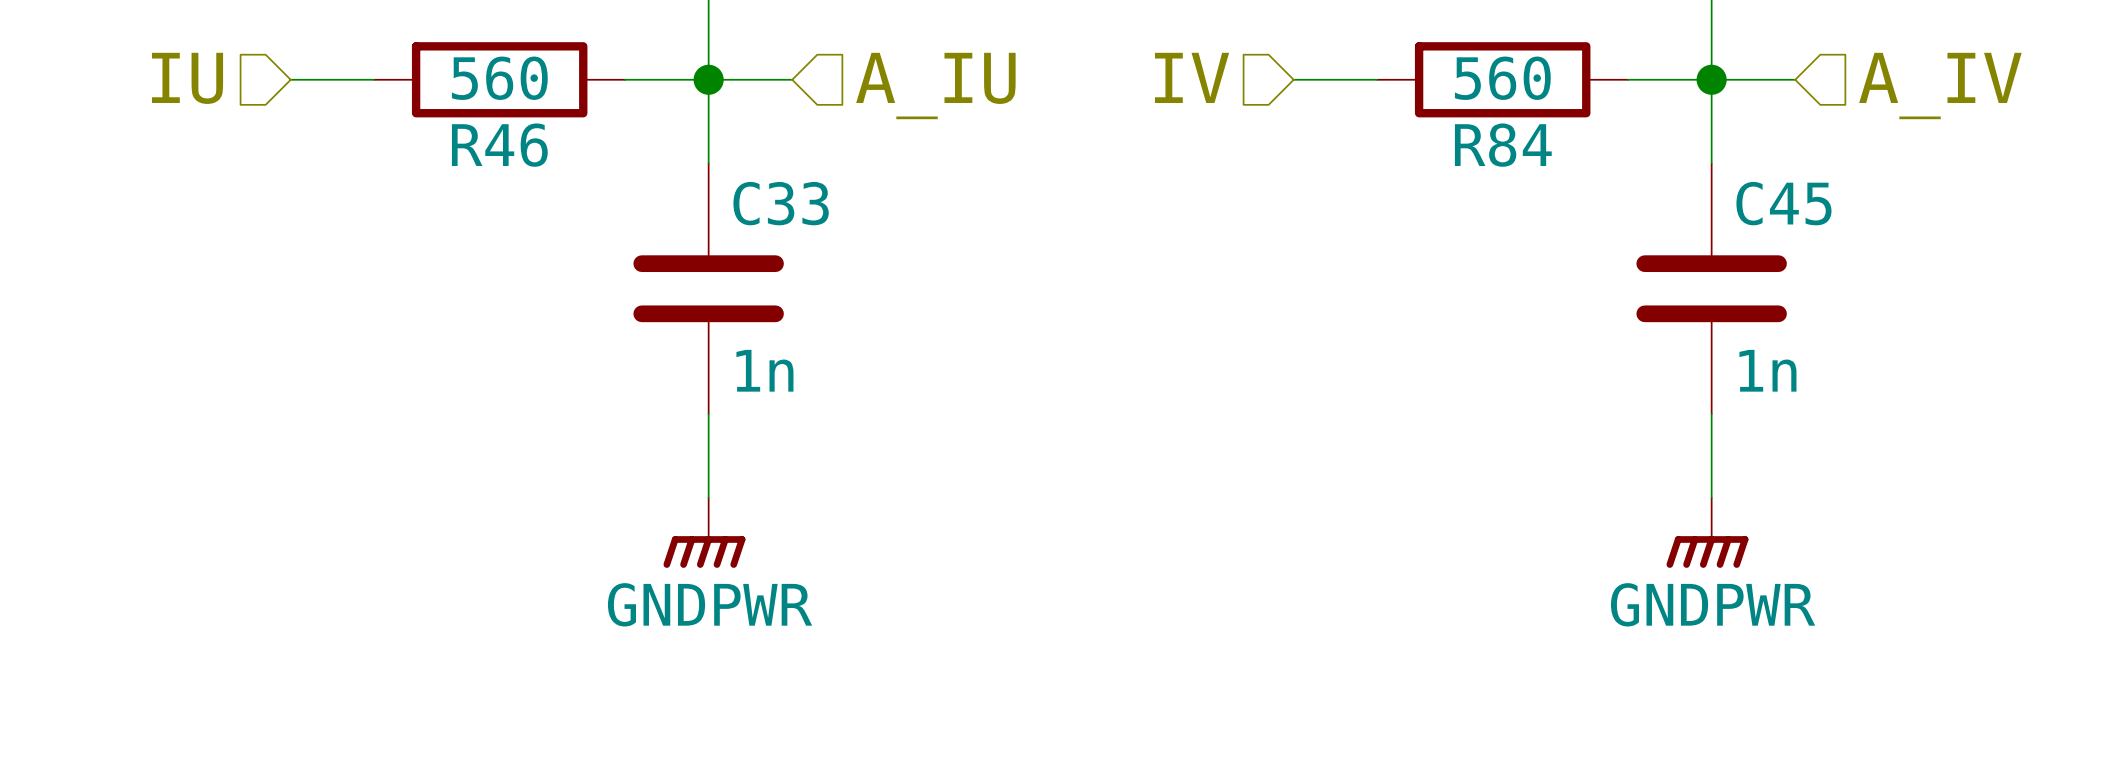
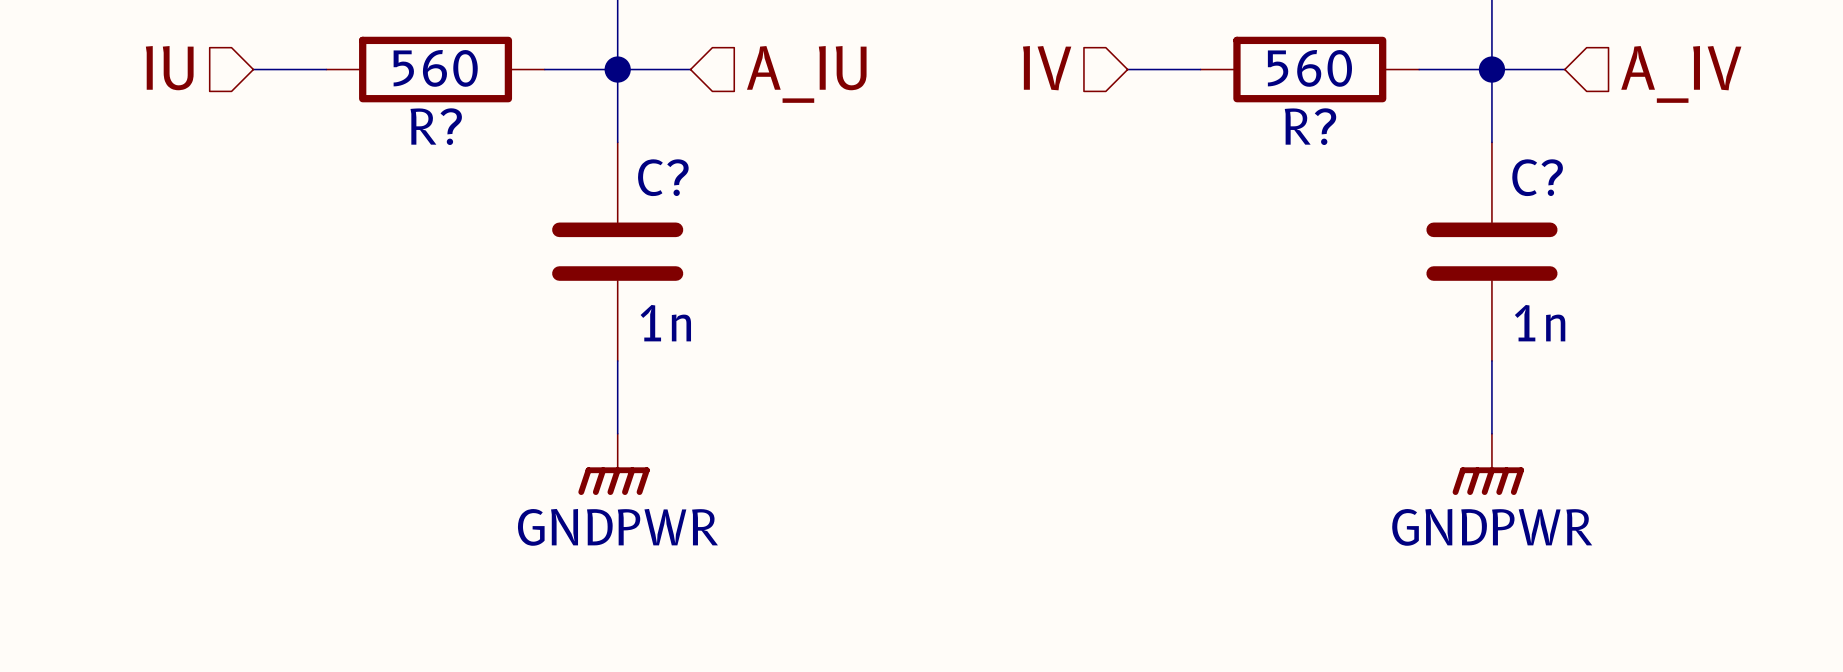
R46 name: R46 (499, 145) -> R? (436, 126)
R84 name: R84 (1503, 145) -> R? (1310, 126)
C33 name: C33 (781, 203) -> C? (663, 177)
C45 name: C45 (1783, 203) -> C? (1537, 177)

